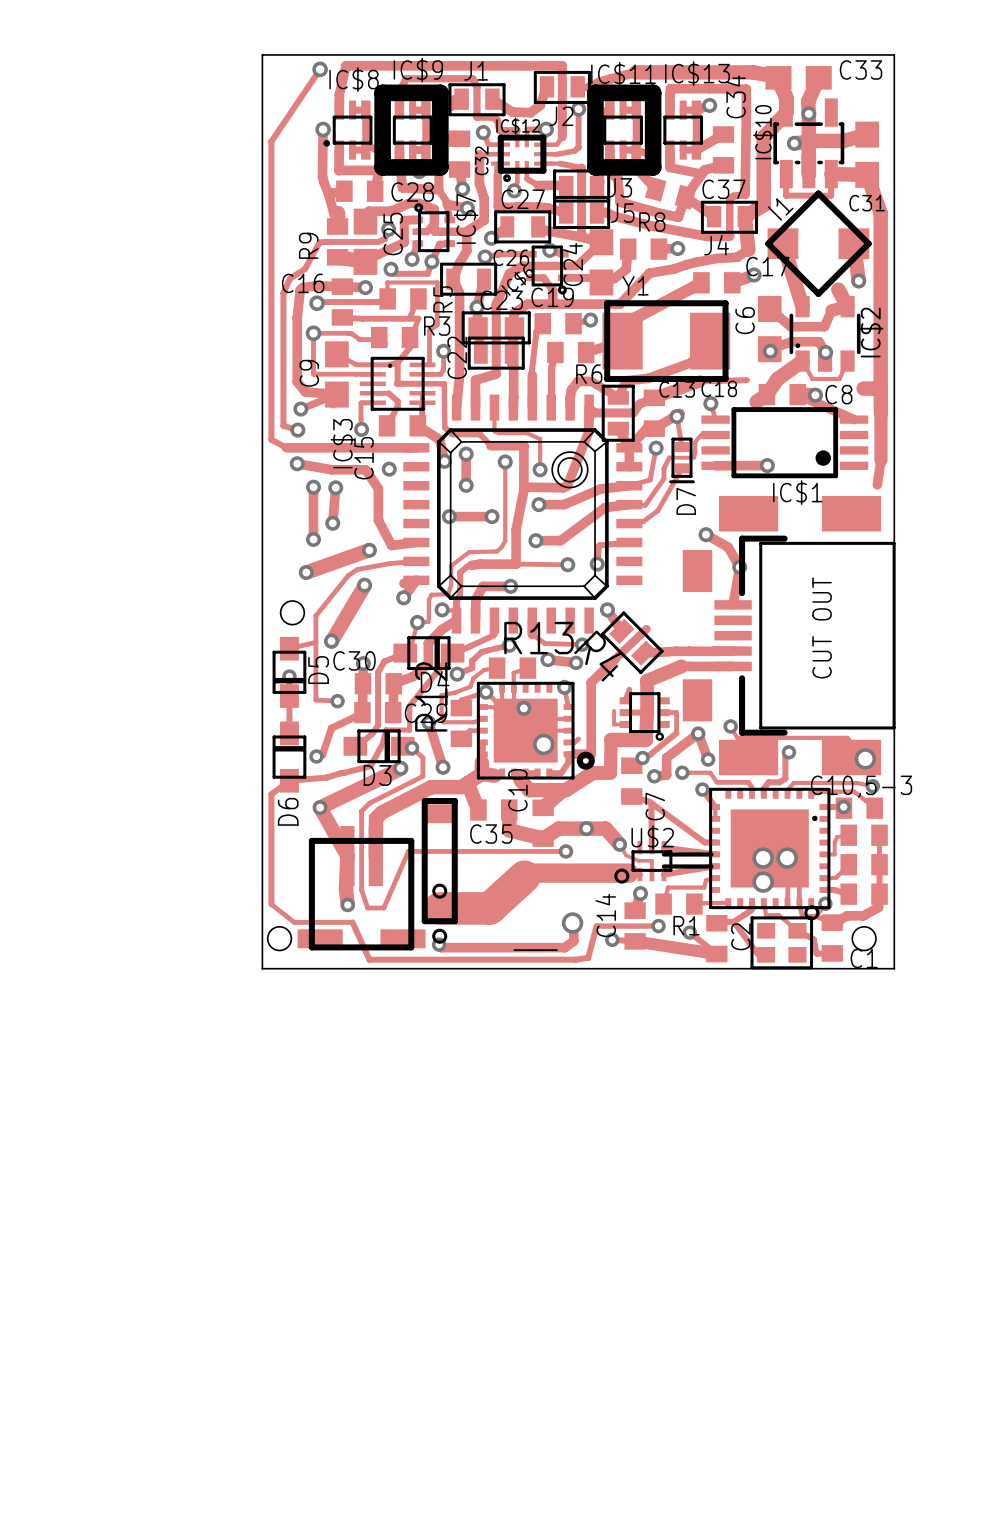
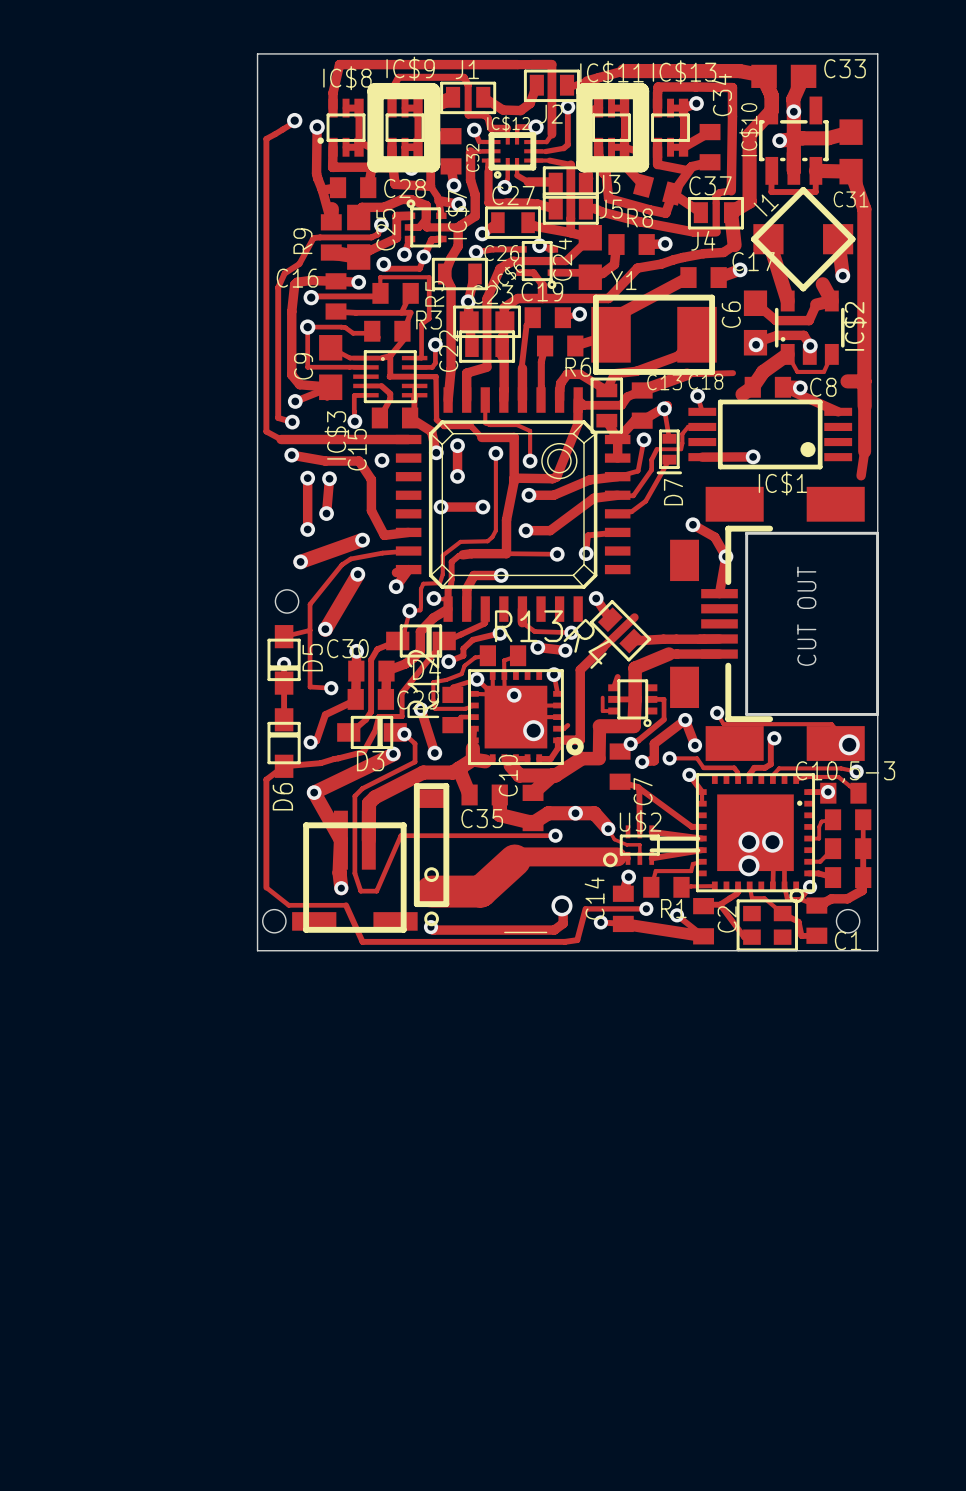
track: (320, 69) (271, 141) -> (294, 120) (266, 138)
via position: (320, 69) -> (294, 120)

